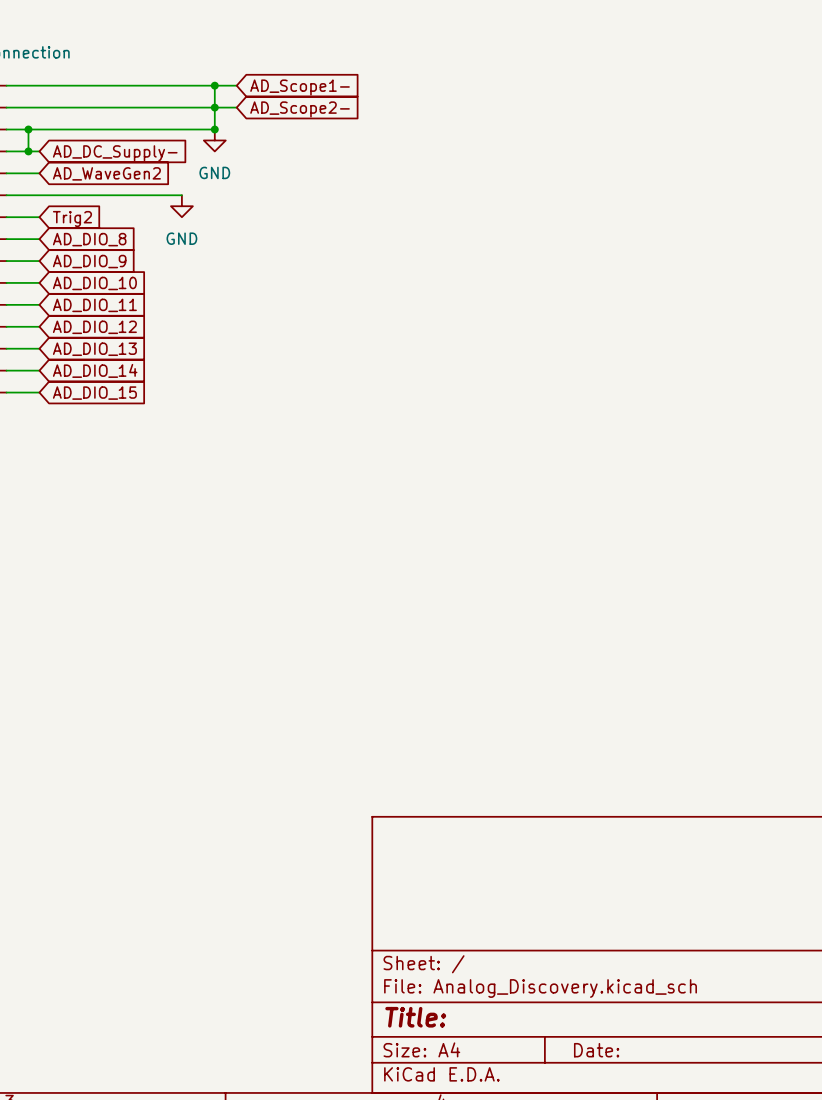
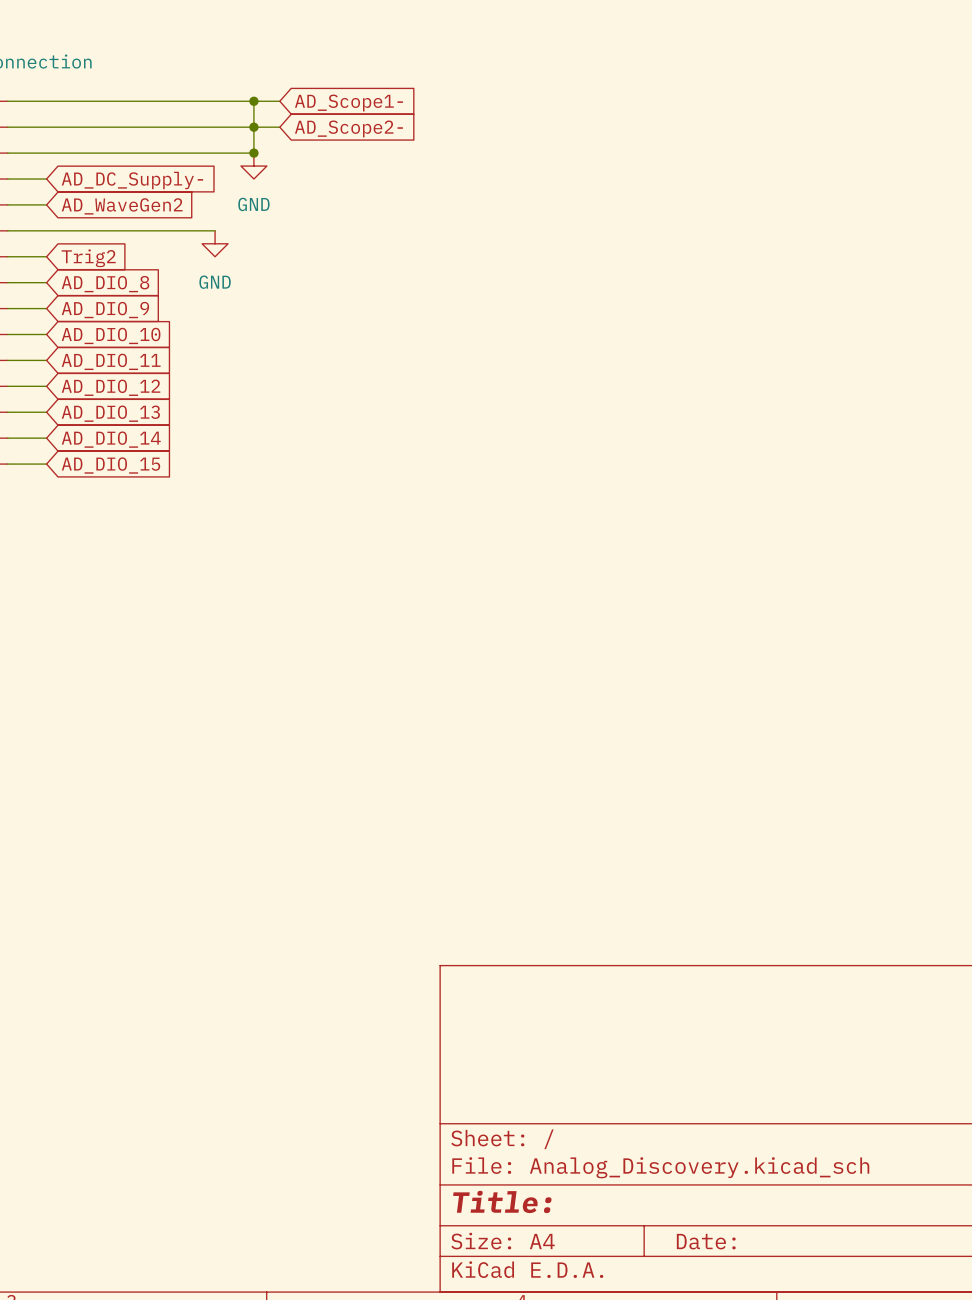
wire: (28, 129) (28, 151) -> none
junction: (28, 129) -> none
junction: (28, 151) -> none

